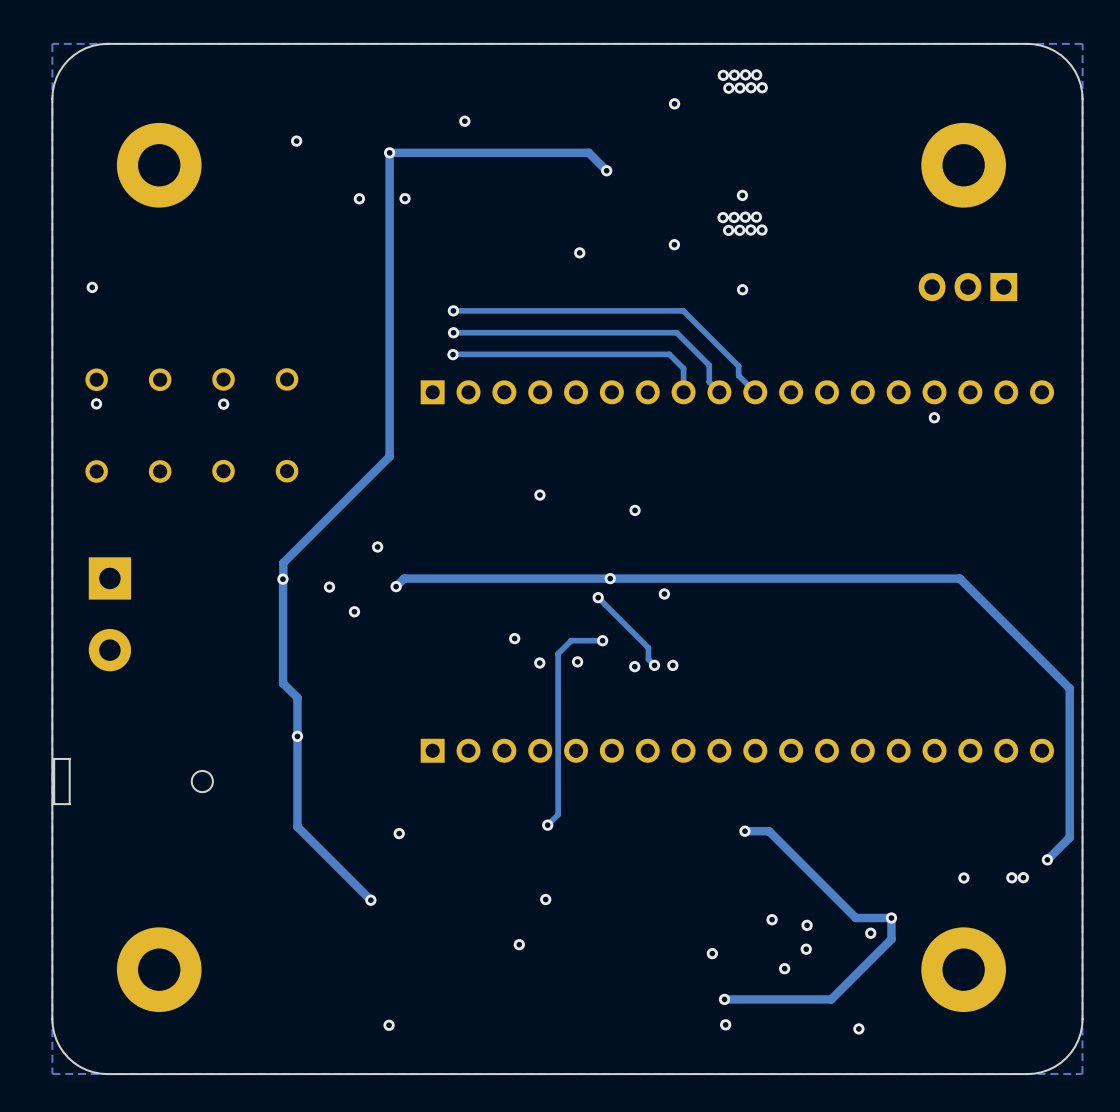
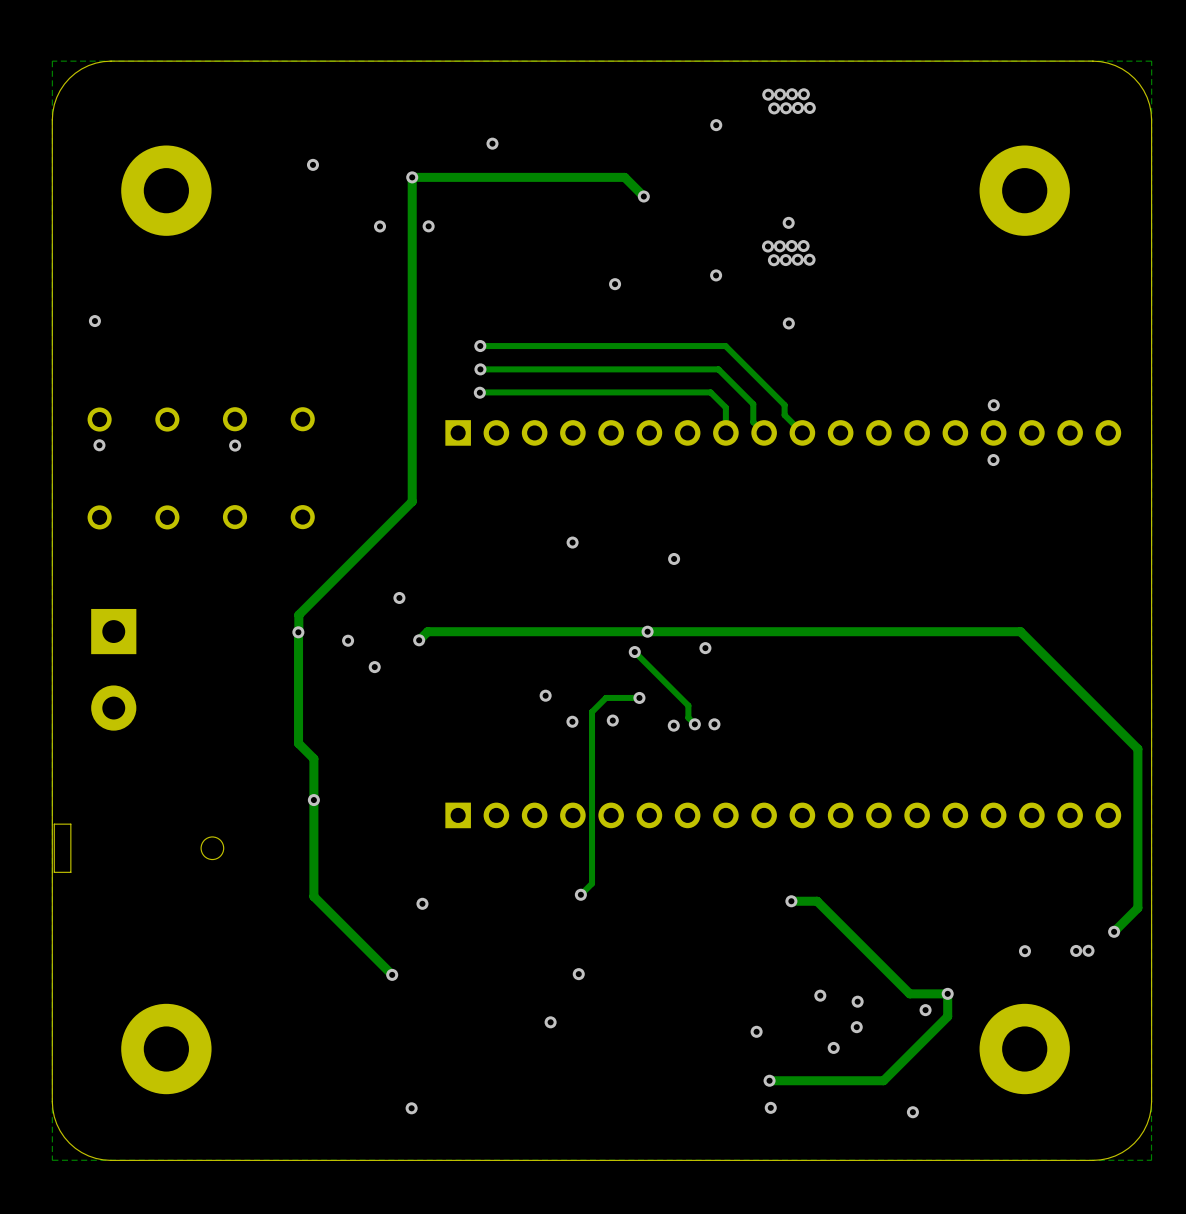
part: (967, 287) -> none
via: none -> (993, 405)

